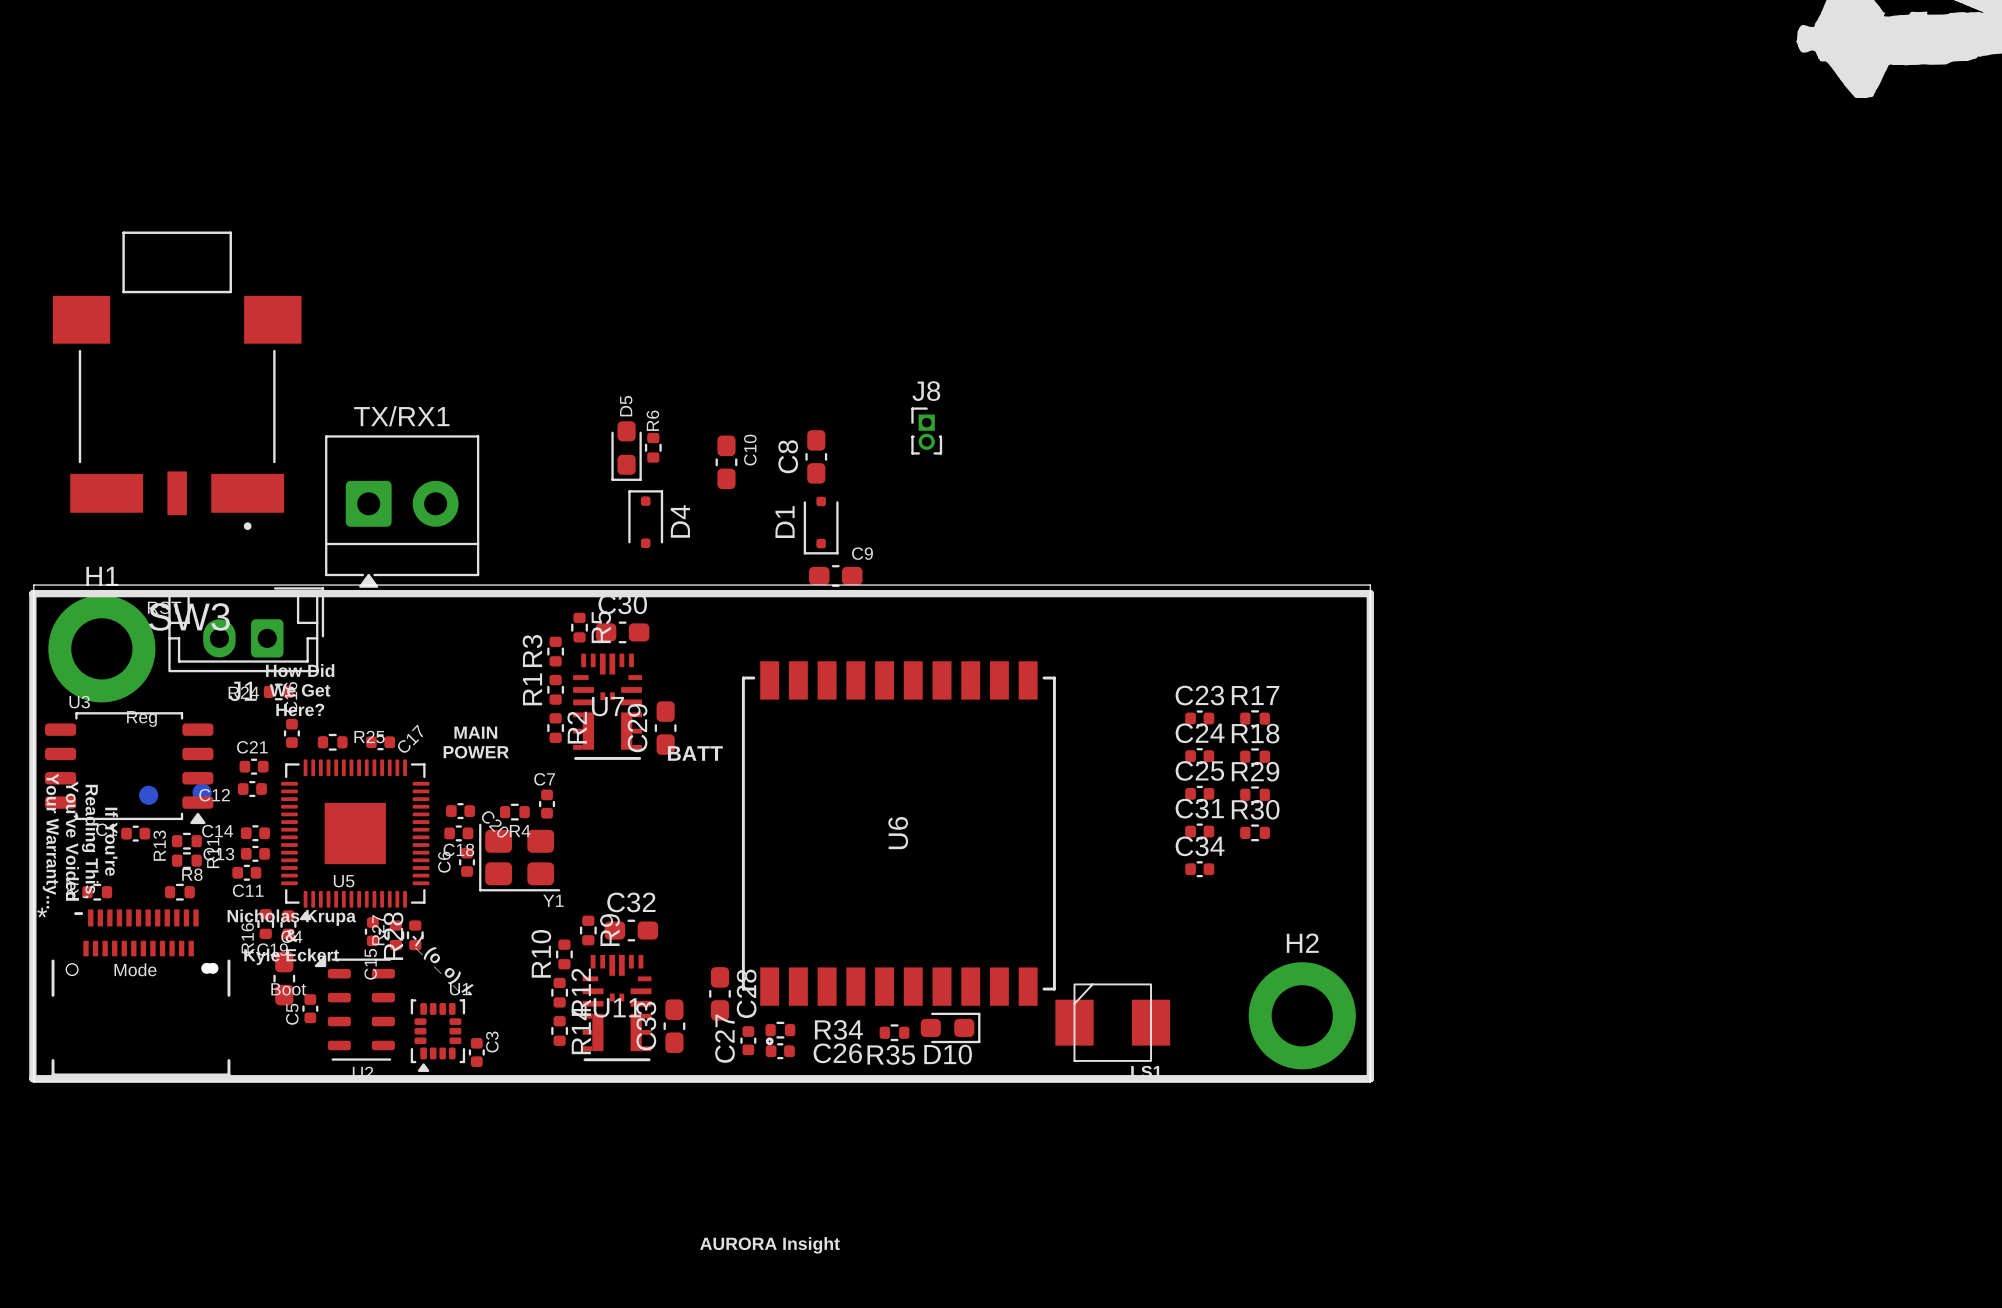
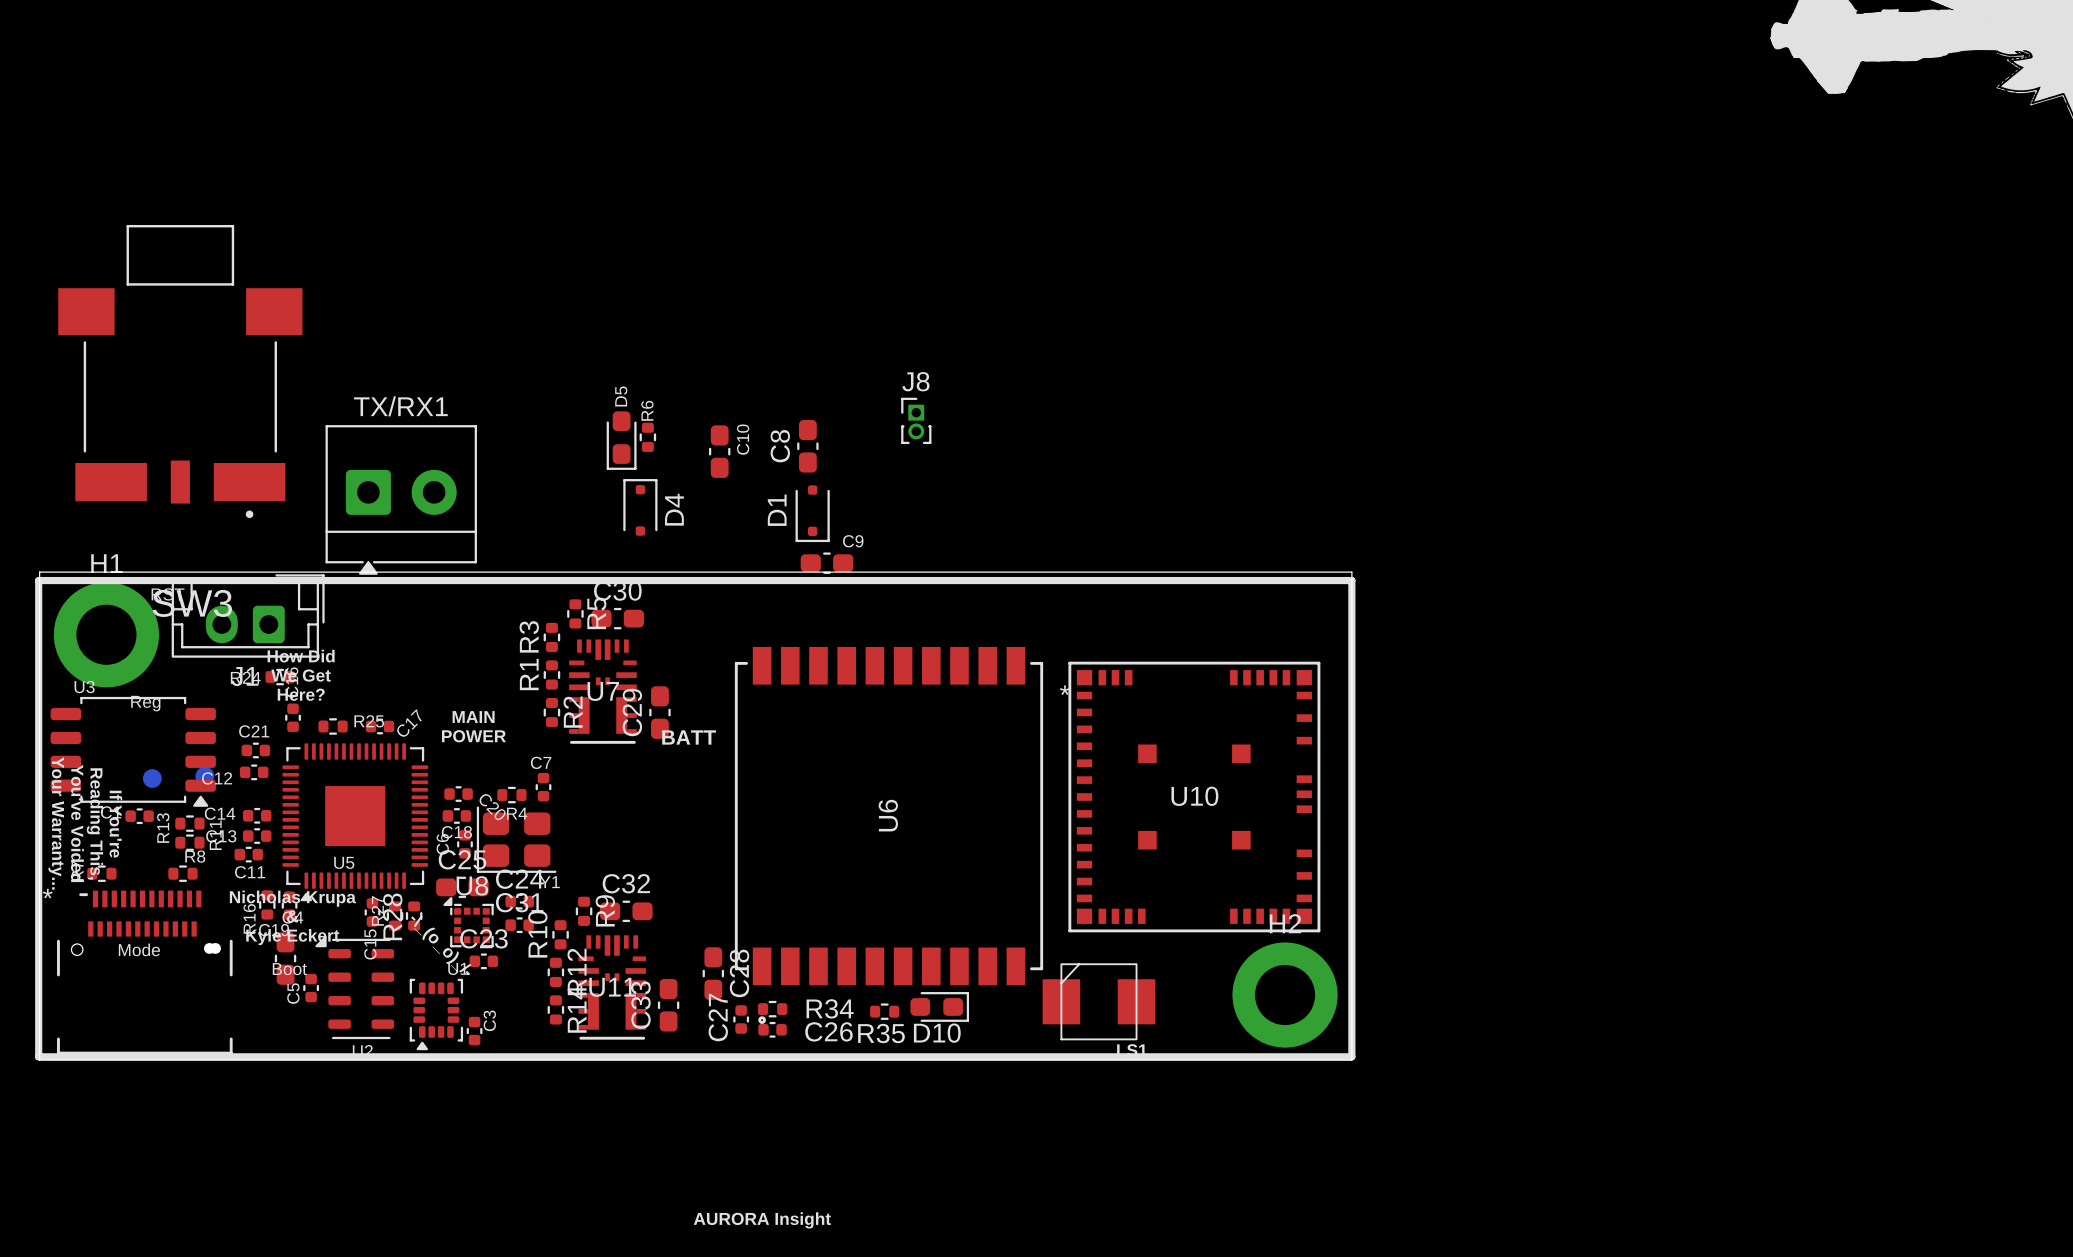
C23 position: (1199, 718) -> (483, 961)
R17: (1255, 718) -> none
C24 position: (1199, 756) -> (519, 901)
R18: (1255, 756) -> none
C25 footprint: [1185, 785, 1215, 802] -> [436, 876, 489, 899]
R29: (1255, 794) -> none
U10: none -> (1194, 797)
C31 position: (1199, 831) -> (519, 925)
R30: (1255, 832) -> none
C34: (1199, 869) -> none
U8: none -> (468, 922)

